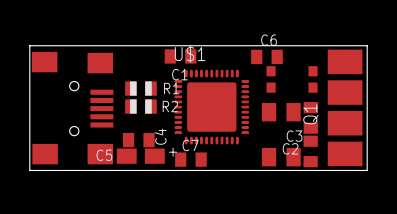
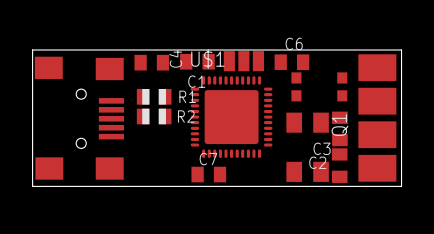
part: none -> (243, 61)
C4 position: (138, 140) -> (151, 62)
C5: (140, 156) -> none

